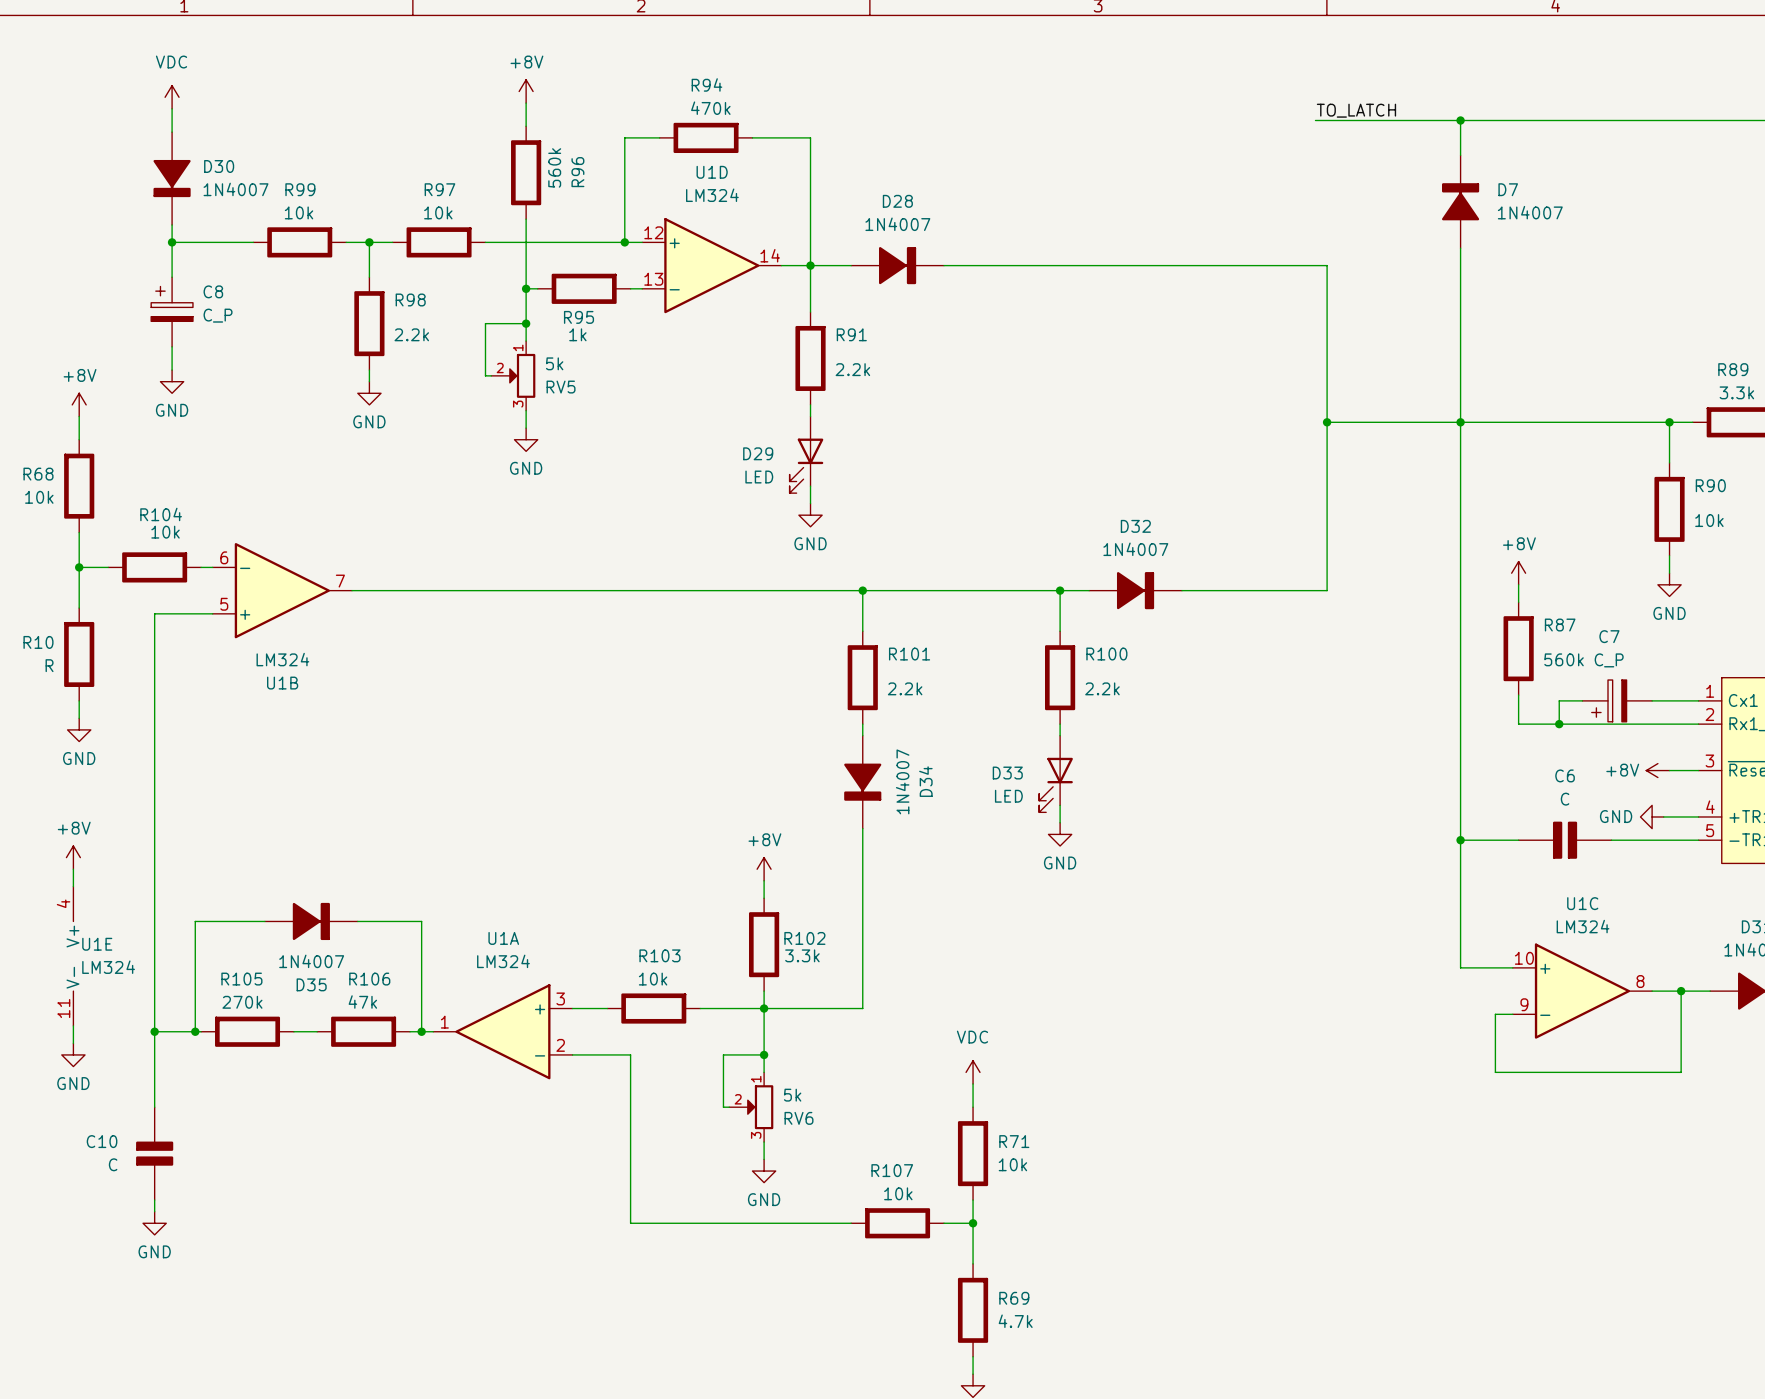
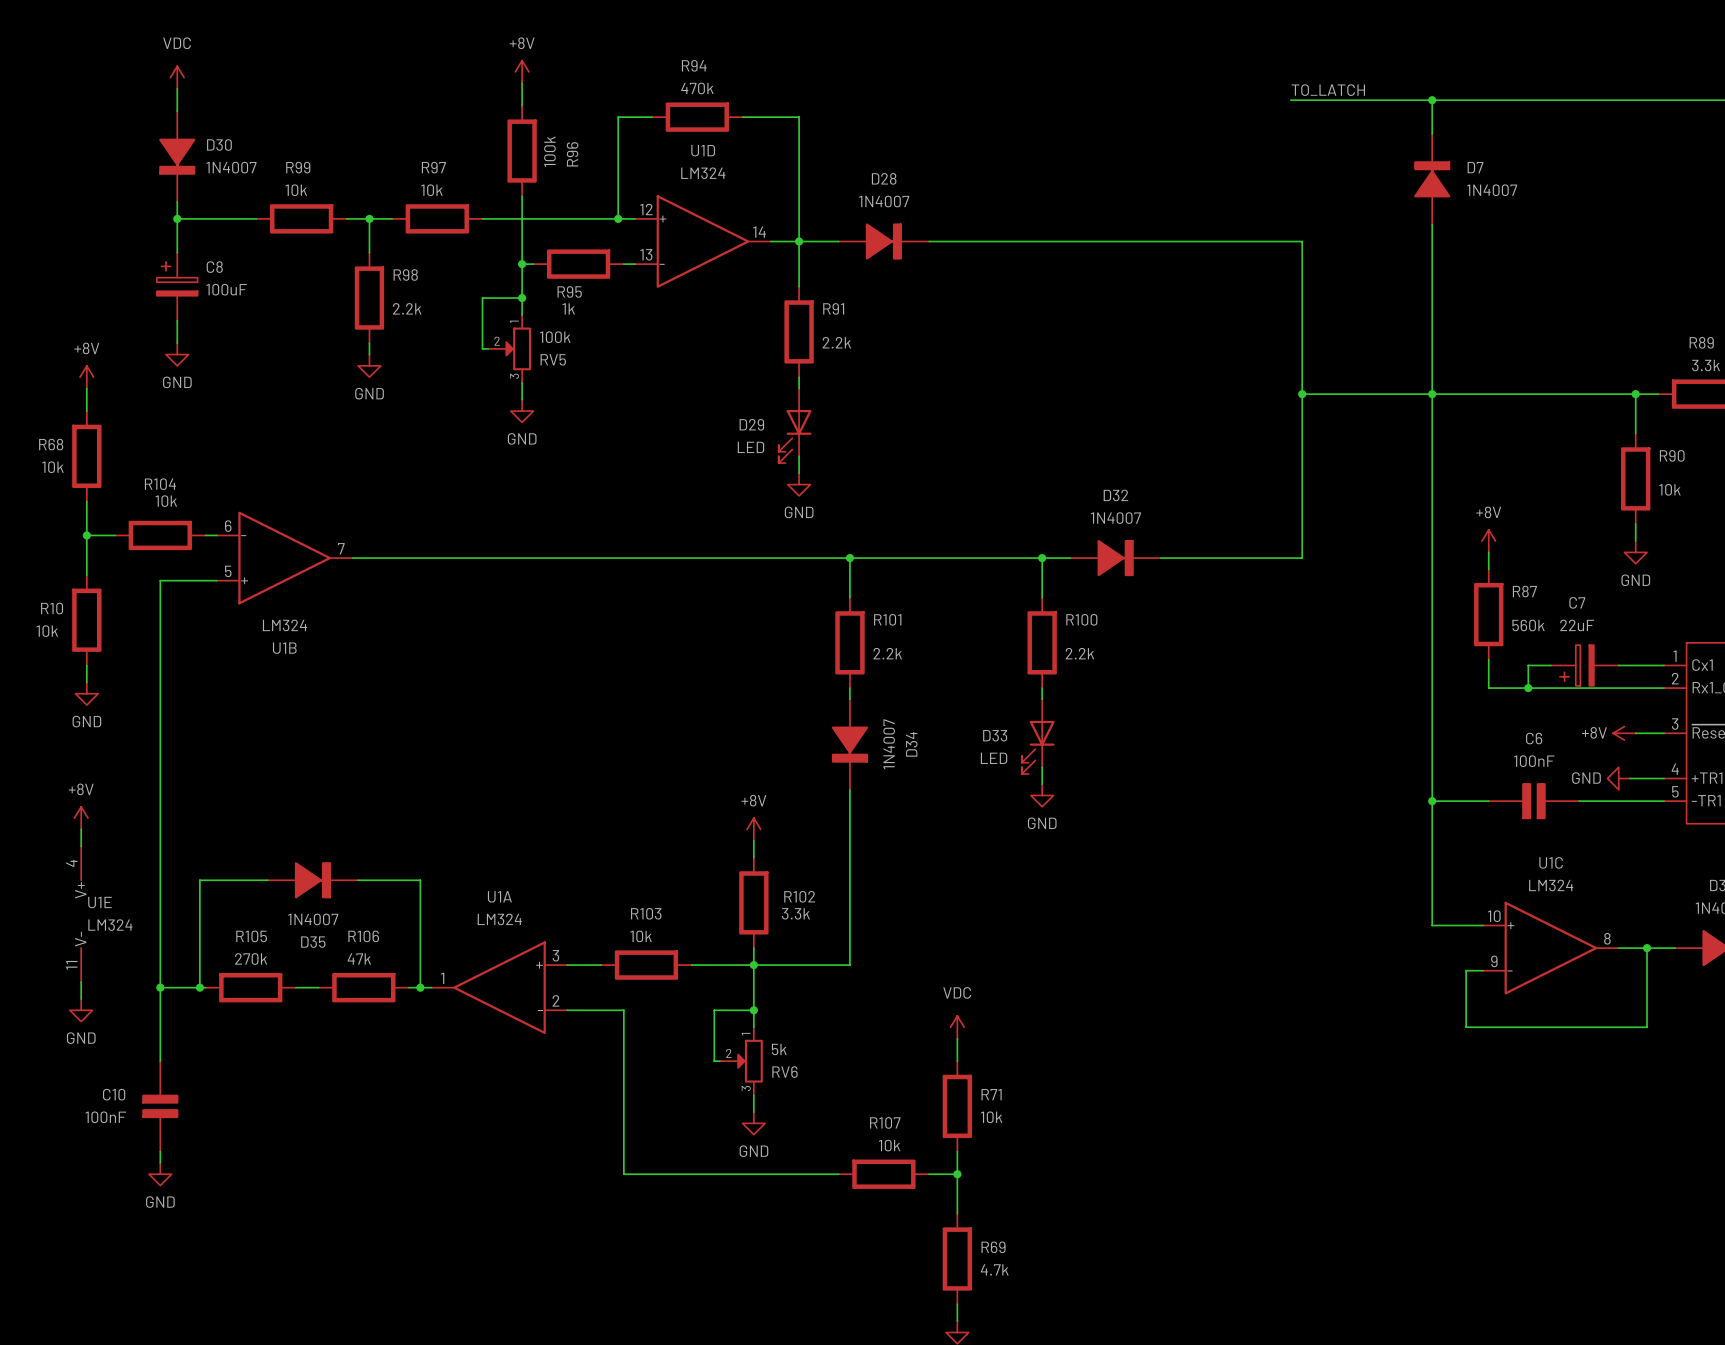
R96 value: 560k (554, 167) -> 100k (549, 151)
C8 value: C_P (218, 315) -> 100uF (226, 289)
RV5 value: 5k (554, 363) -> 100k (555, 337)
C7 value: C_P (1609, 660) -> 22uF (1577, 625)
R10 value: R (49, 665) -> 10k (47, 631)
C6 value: C (1565, 799) -> 100nF (1534, 761)
C10 value: C (113, 1164) -> 100nF (105, 1117)

